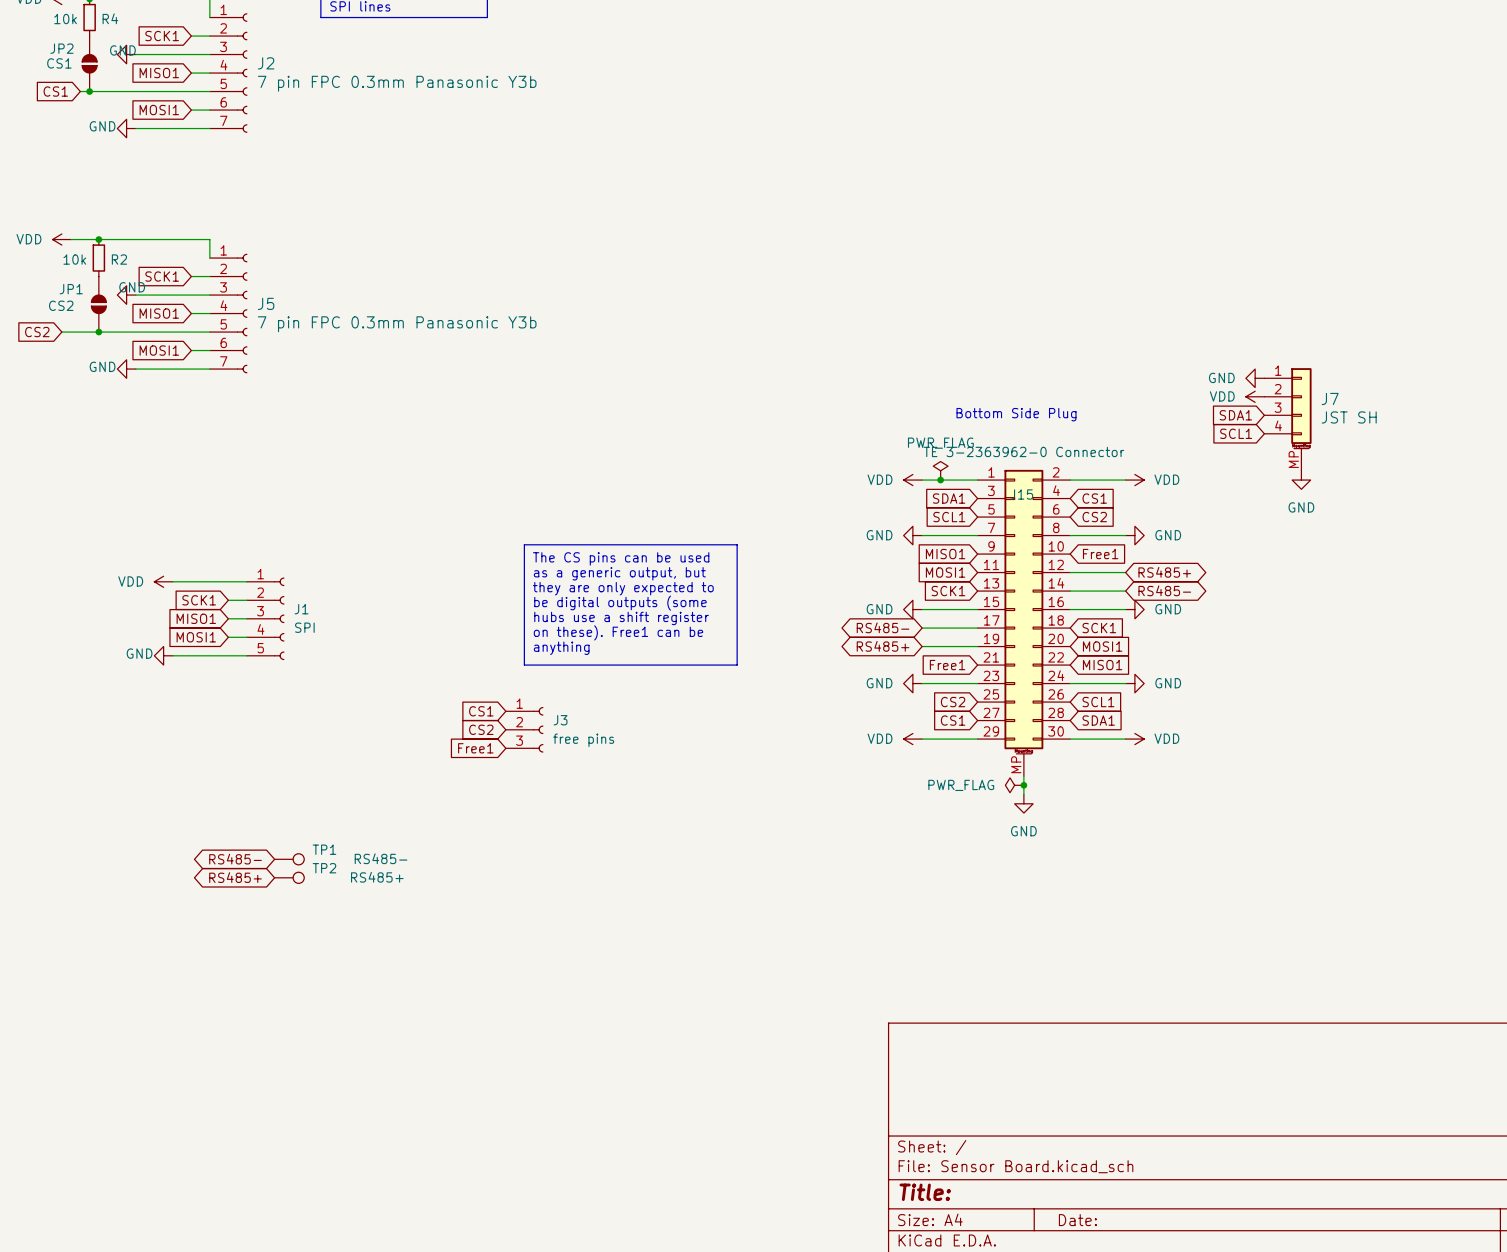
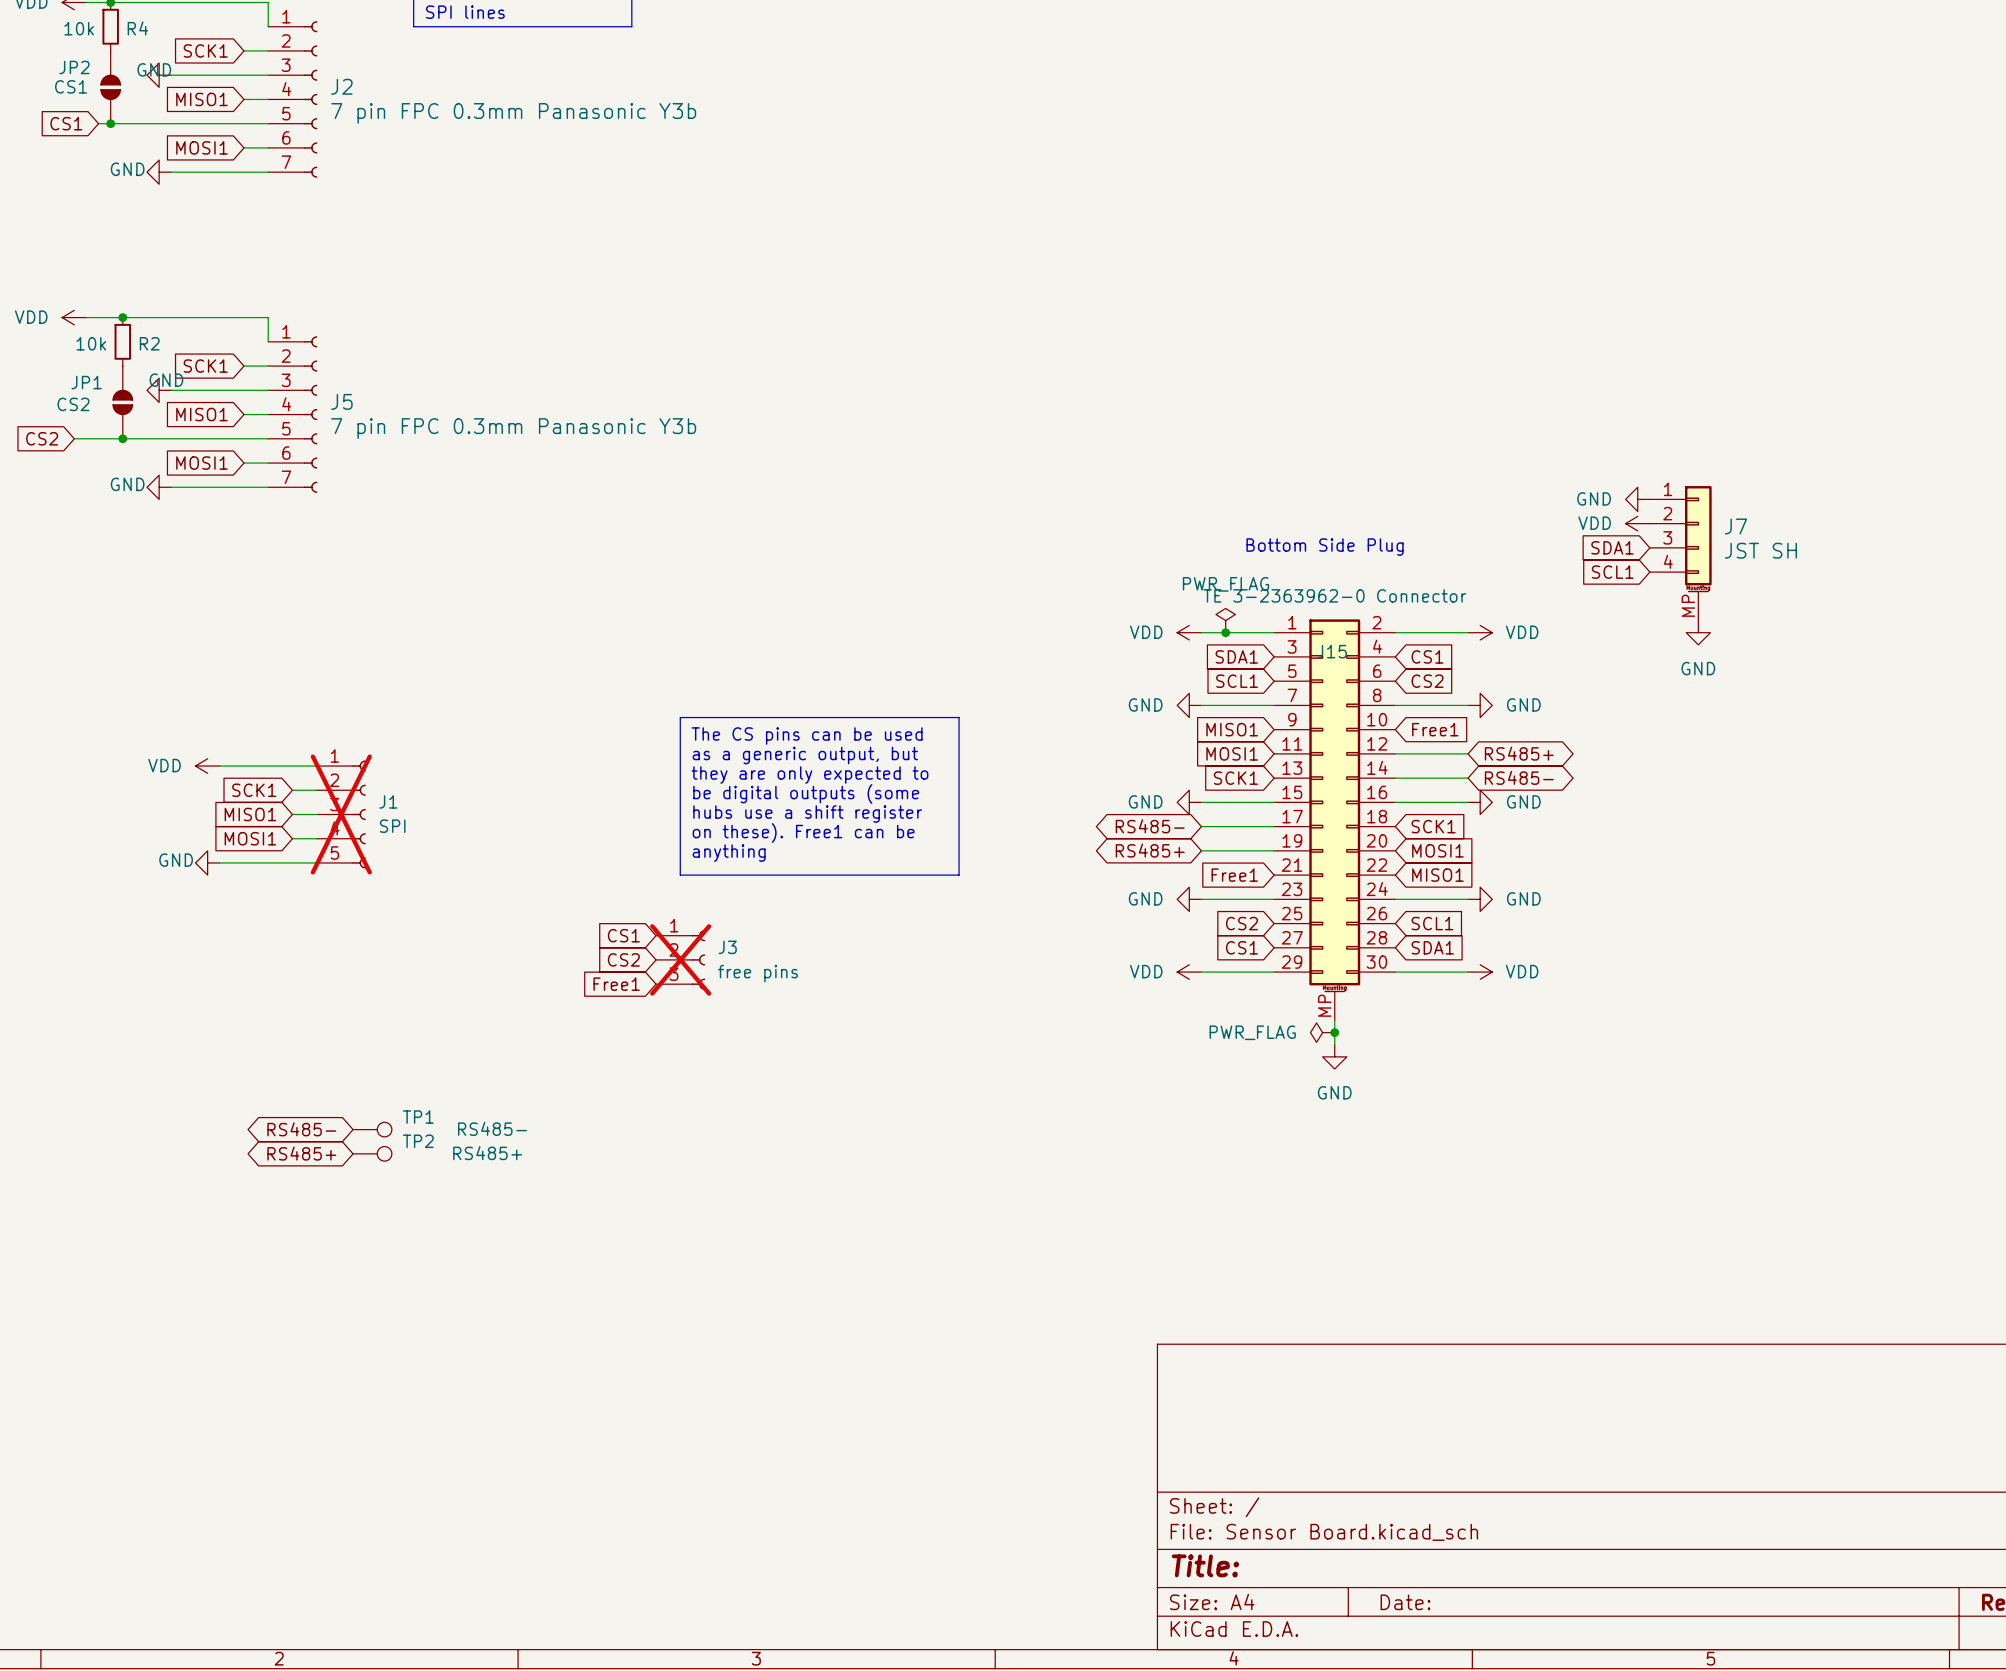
J1 do-not-place cross: none -> (341, 814)
J3 do-not-place cross: none -> (680, 959)

